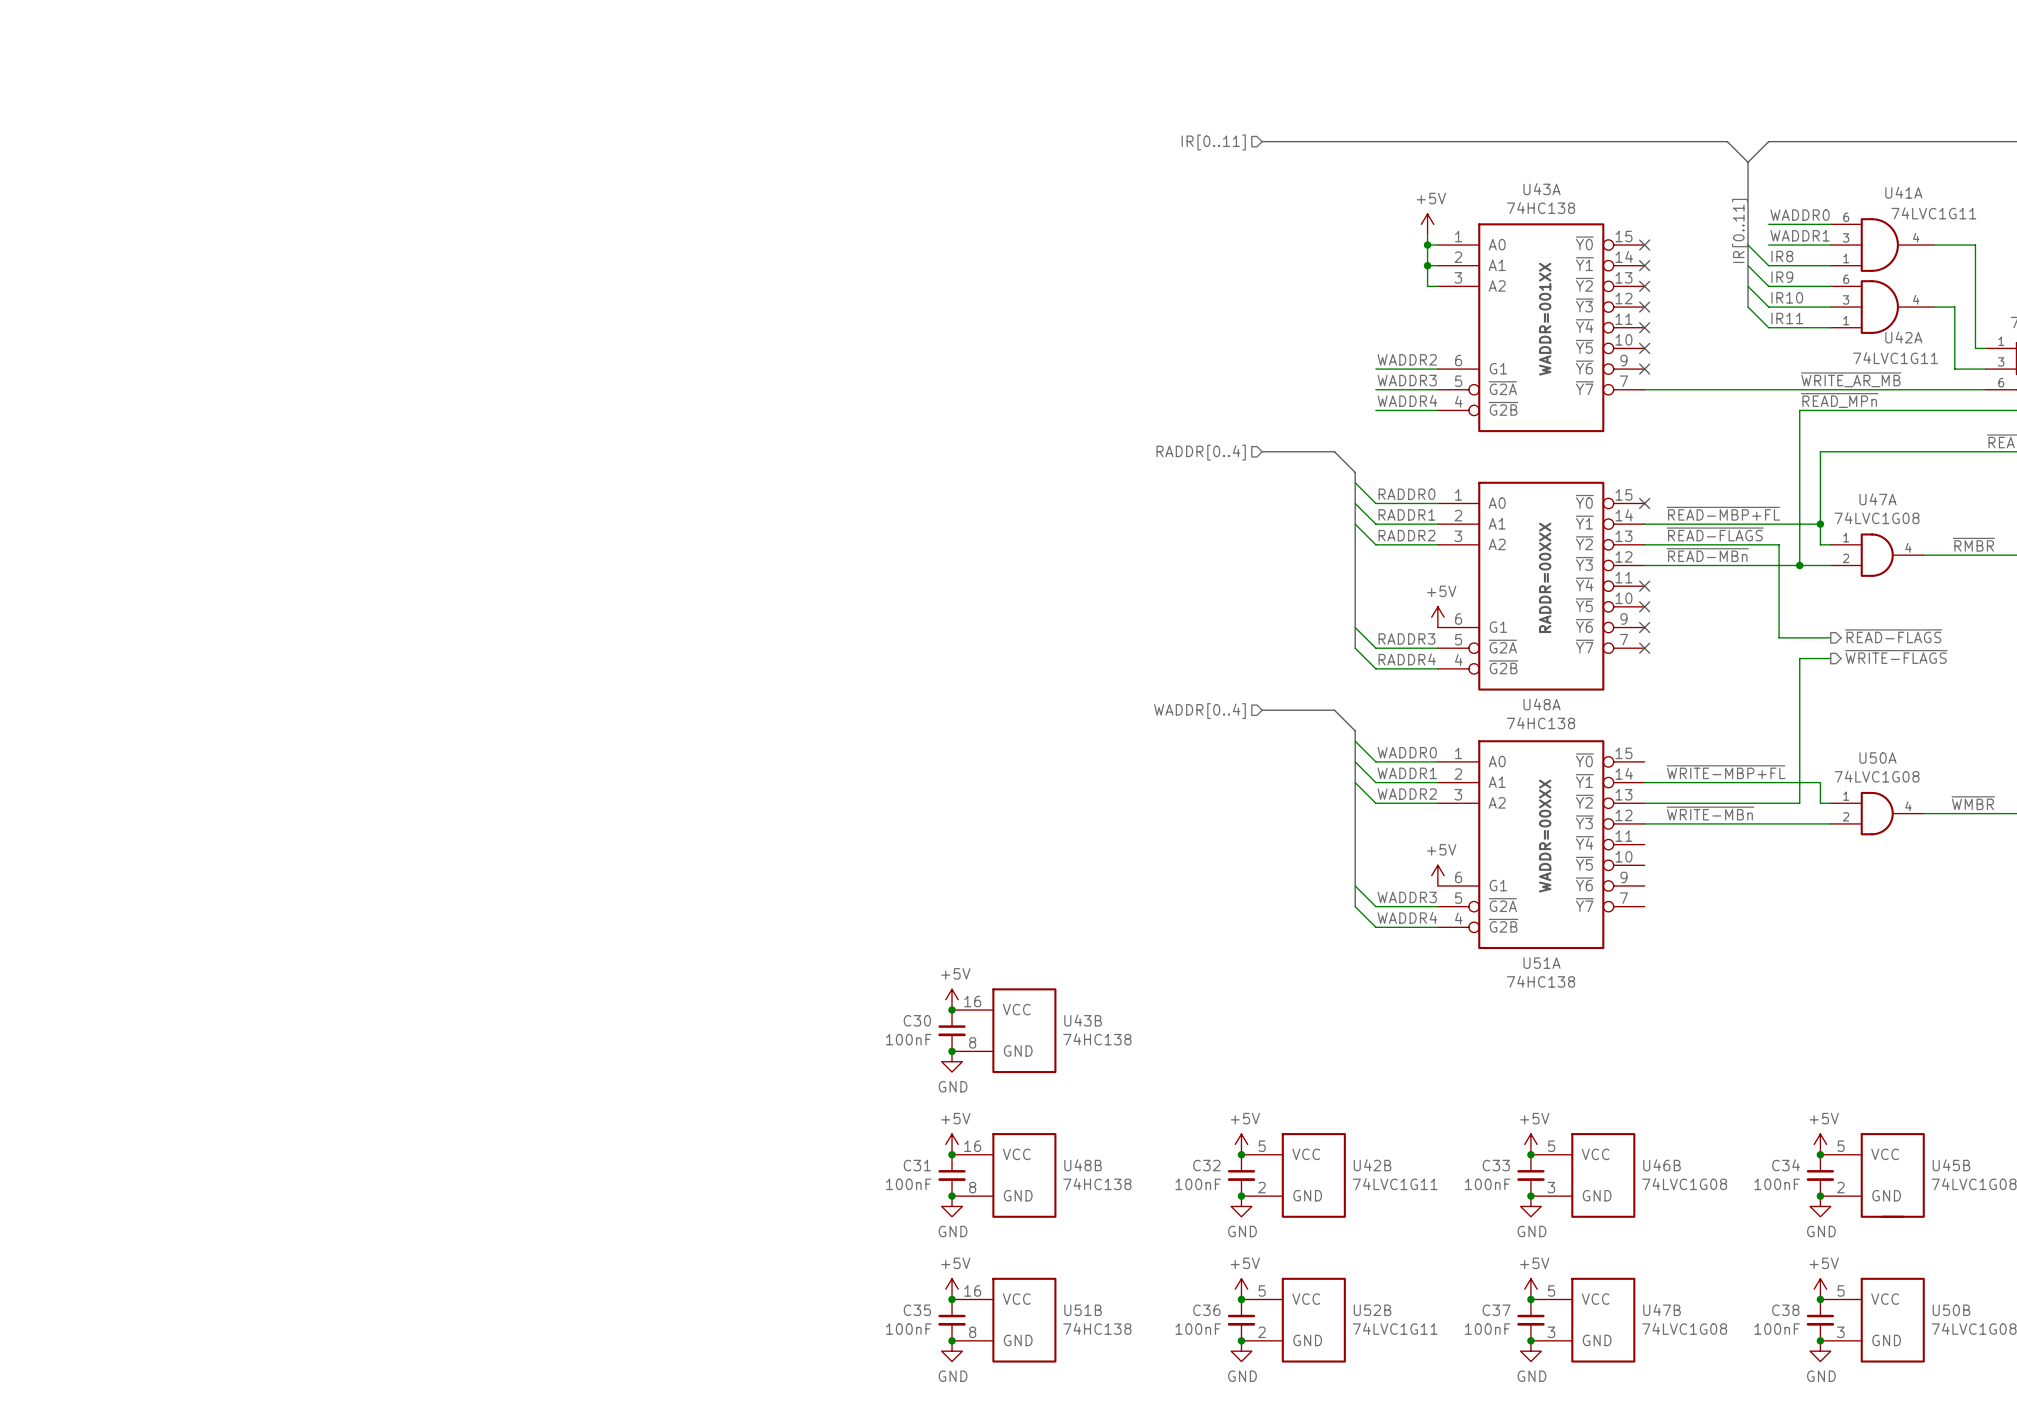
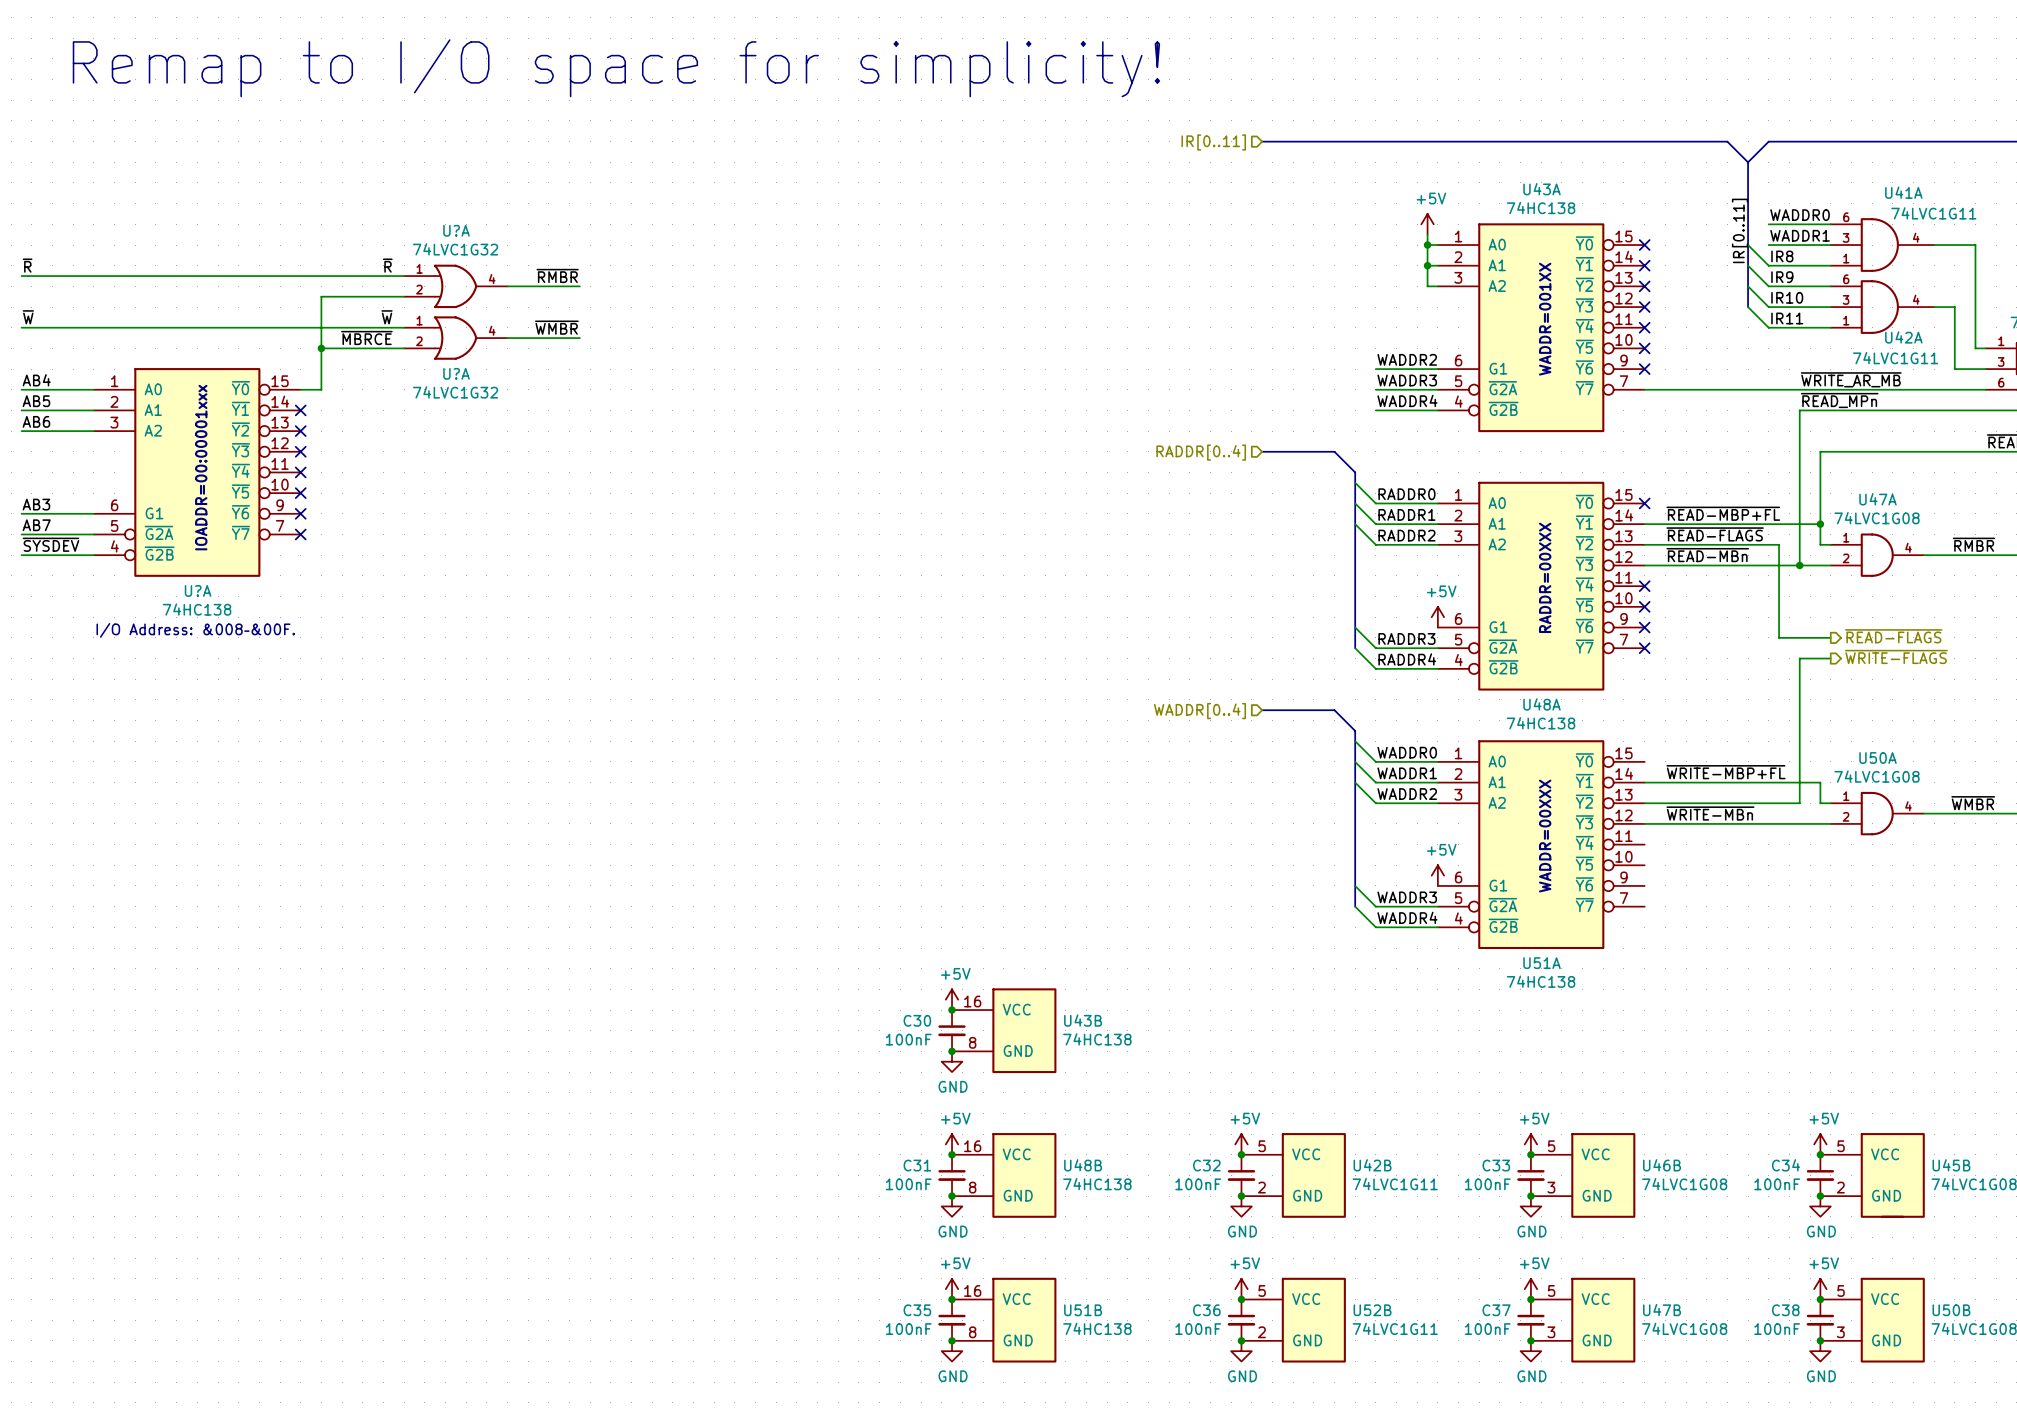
text: none -> Remap to I/O space for simplicity! (616, 68)
label: none -> ~{R} (27, 265)
label: none -> ~{R} (387, 265)
label: none -> ~{RMBR} (557, 275)
wire: none -> (21, 276) (404, 276)
U?A: none -> 74LVC1G32 (455, 286)
wire: none -> (507, 286) (579, 286)
wire: none -> (404, 296) (321, 296) (321, 389) (300, 389)
label: none -> ~{W} (28, 317)
label: none -> ~{W} (387, 317)
wire: none -> (21, 327) (404, 327)
label: none -> ~{WMBR} (556, 327)
label: none -> ~{MBRCE} (366, 337)
U?A: none -> 74LVC1G32 (455, 338)
wire: none -> (507, 338) (579, 338)
wire: none -> (321, 348) (404, 348)
junction: none -> (321, 348)
label: none -> AB4 (36, 380)
wire: none -> (21, 389) (93, 389)
label: none -> AB5 (36, 401)
wire: none -> (21, 410) (93, 410)
no-connect mark: none -> (300, 410)
label: none -> AB6 (36, 421)
wire: none -> (21, 431) (93, 431)
no-connect mark: none -> (300, 431)
no-connect mark: none -> (300, 451)
text: none -> IOADDR=00:00001xxx (201, 467)
U?A: none -> 74HC138 (197, 472)
no-connect mark: none -> (300, 472)
no-connect mark: none -> (300, 493)
label: none -> AB3 (36, 504)
wire: none -> (21, 513) (93, 513)
no-connect mark: none -> (300, 513)
label: none -> AB7 (36, 525)
wire: none -> (21, 534) (93, 534)
no-connect mark: none -> (300, 534)
label: none -> ~{SYSDEV} (50, 544)
wire: none -> (21, 555) (93, 555)
text: none -> I/O Address: &008–&00F. (195, 630)

